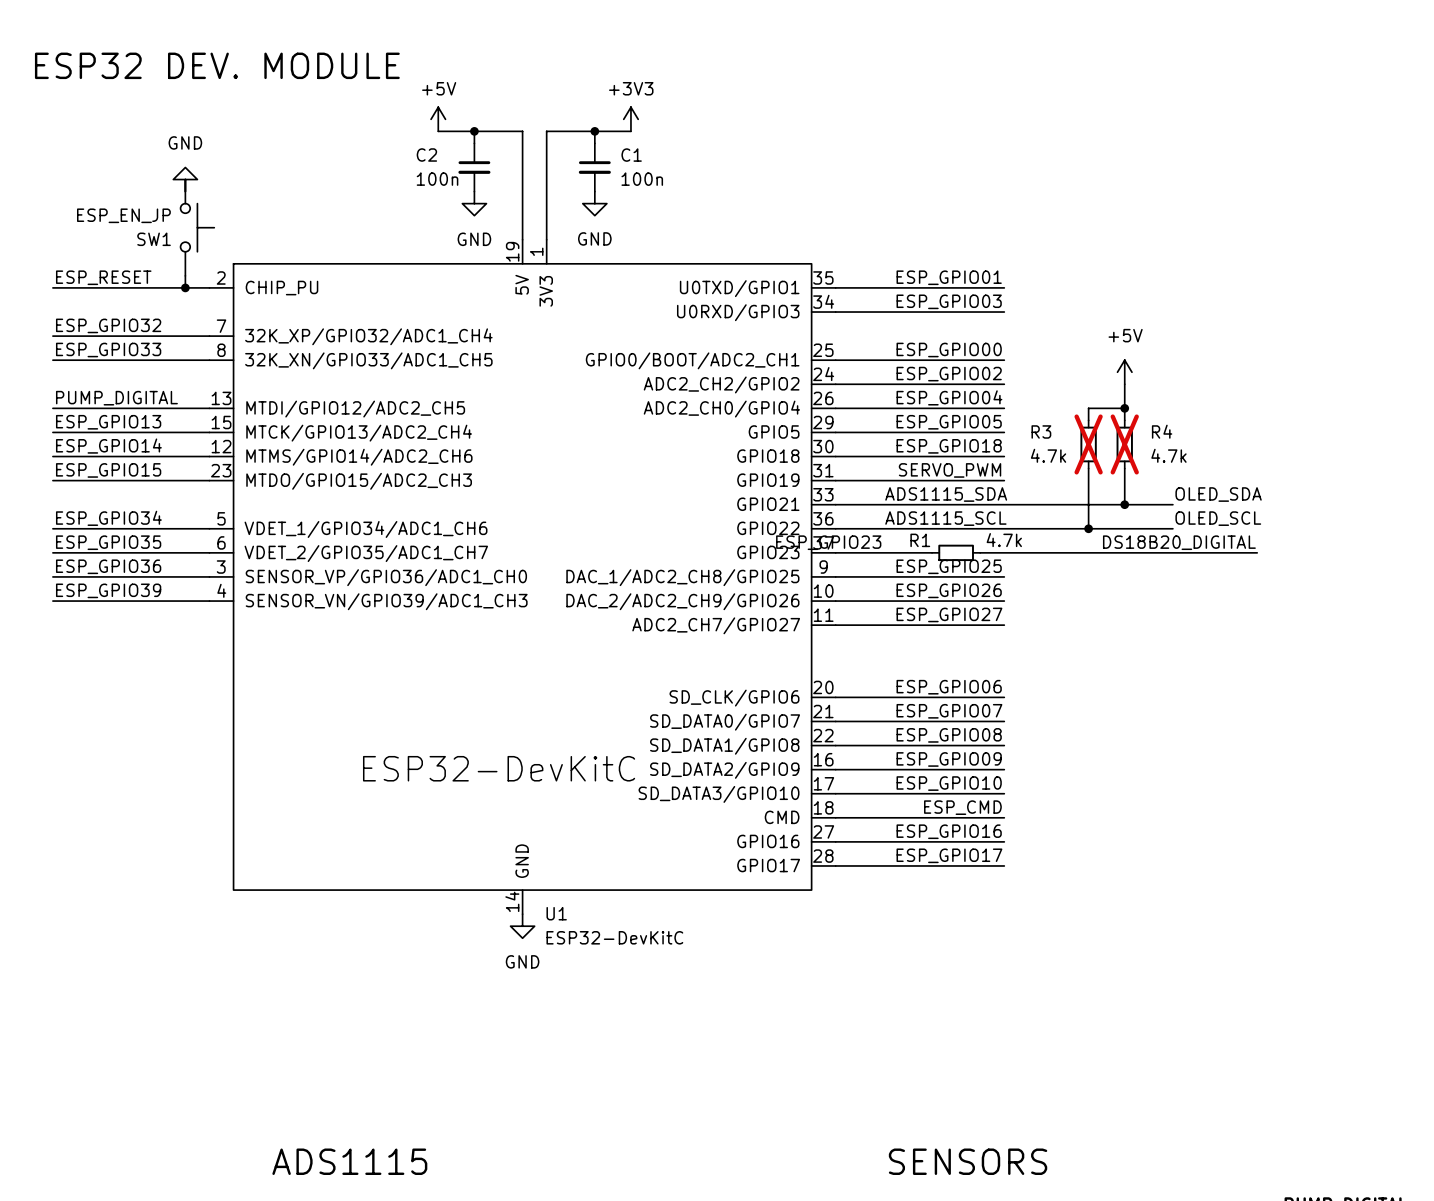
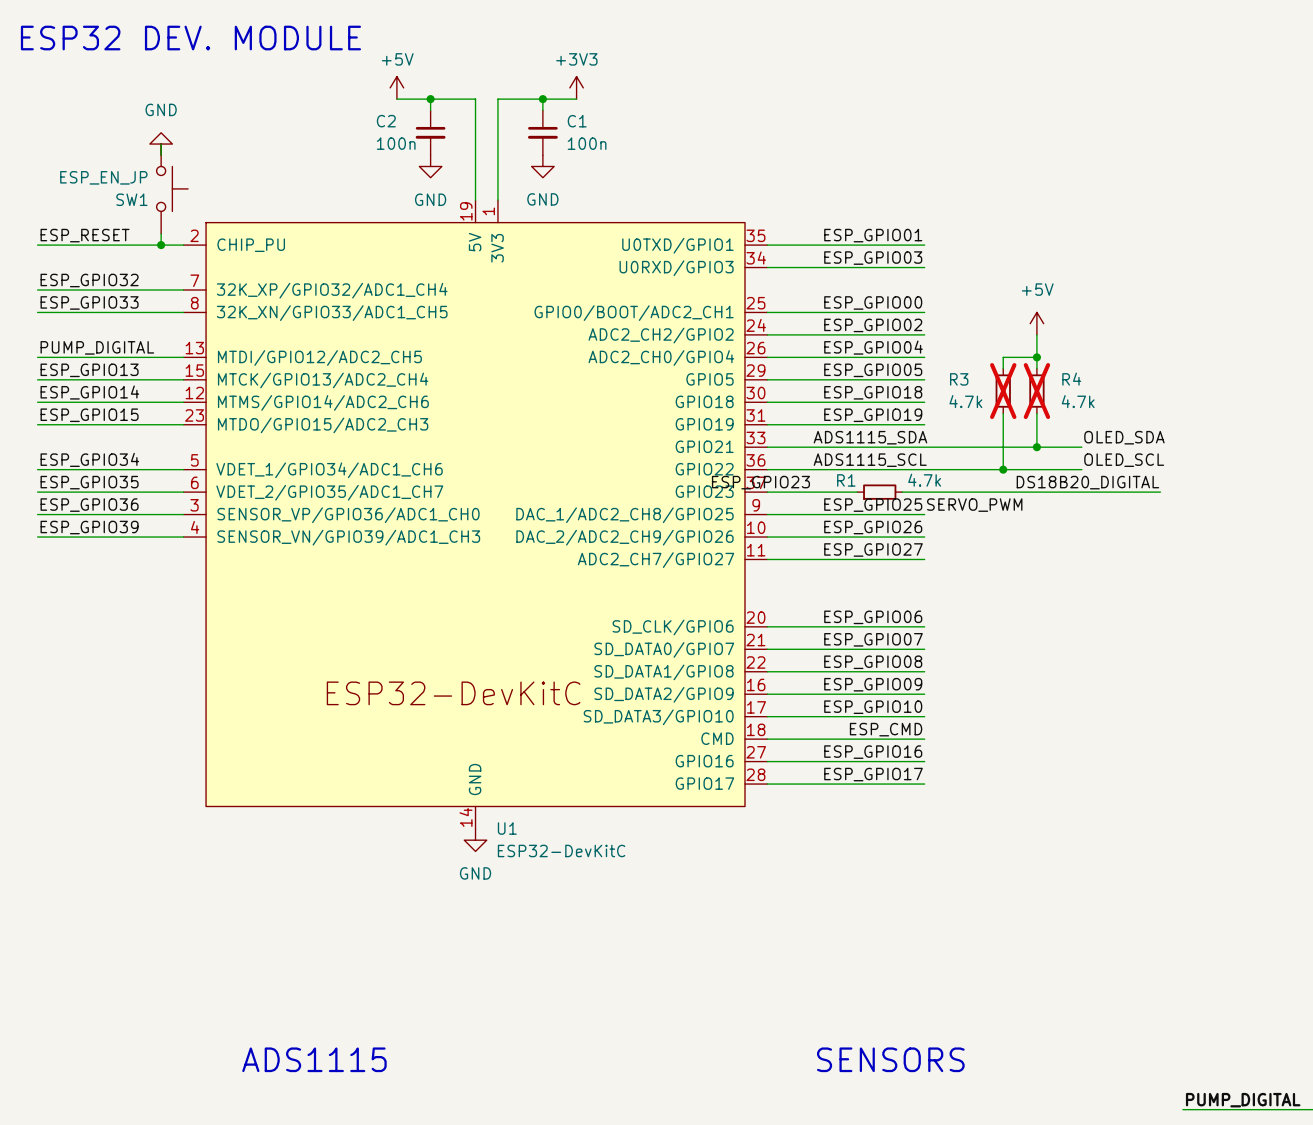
label: SERVO_PWM (950, 470) -> ESP_GPIO19 (873, 415)
label: none -> SERVO_PWM (974, 505)

